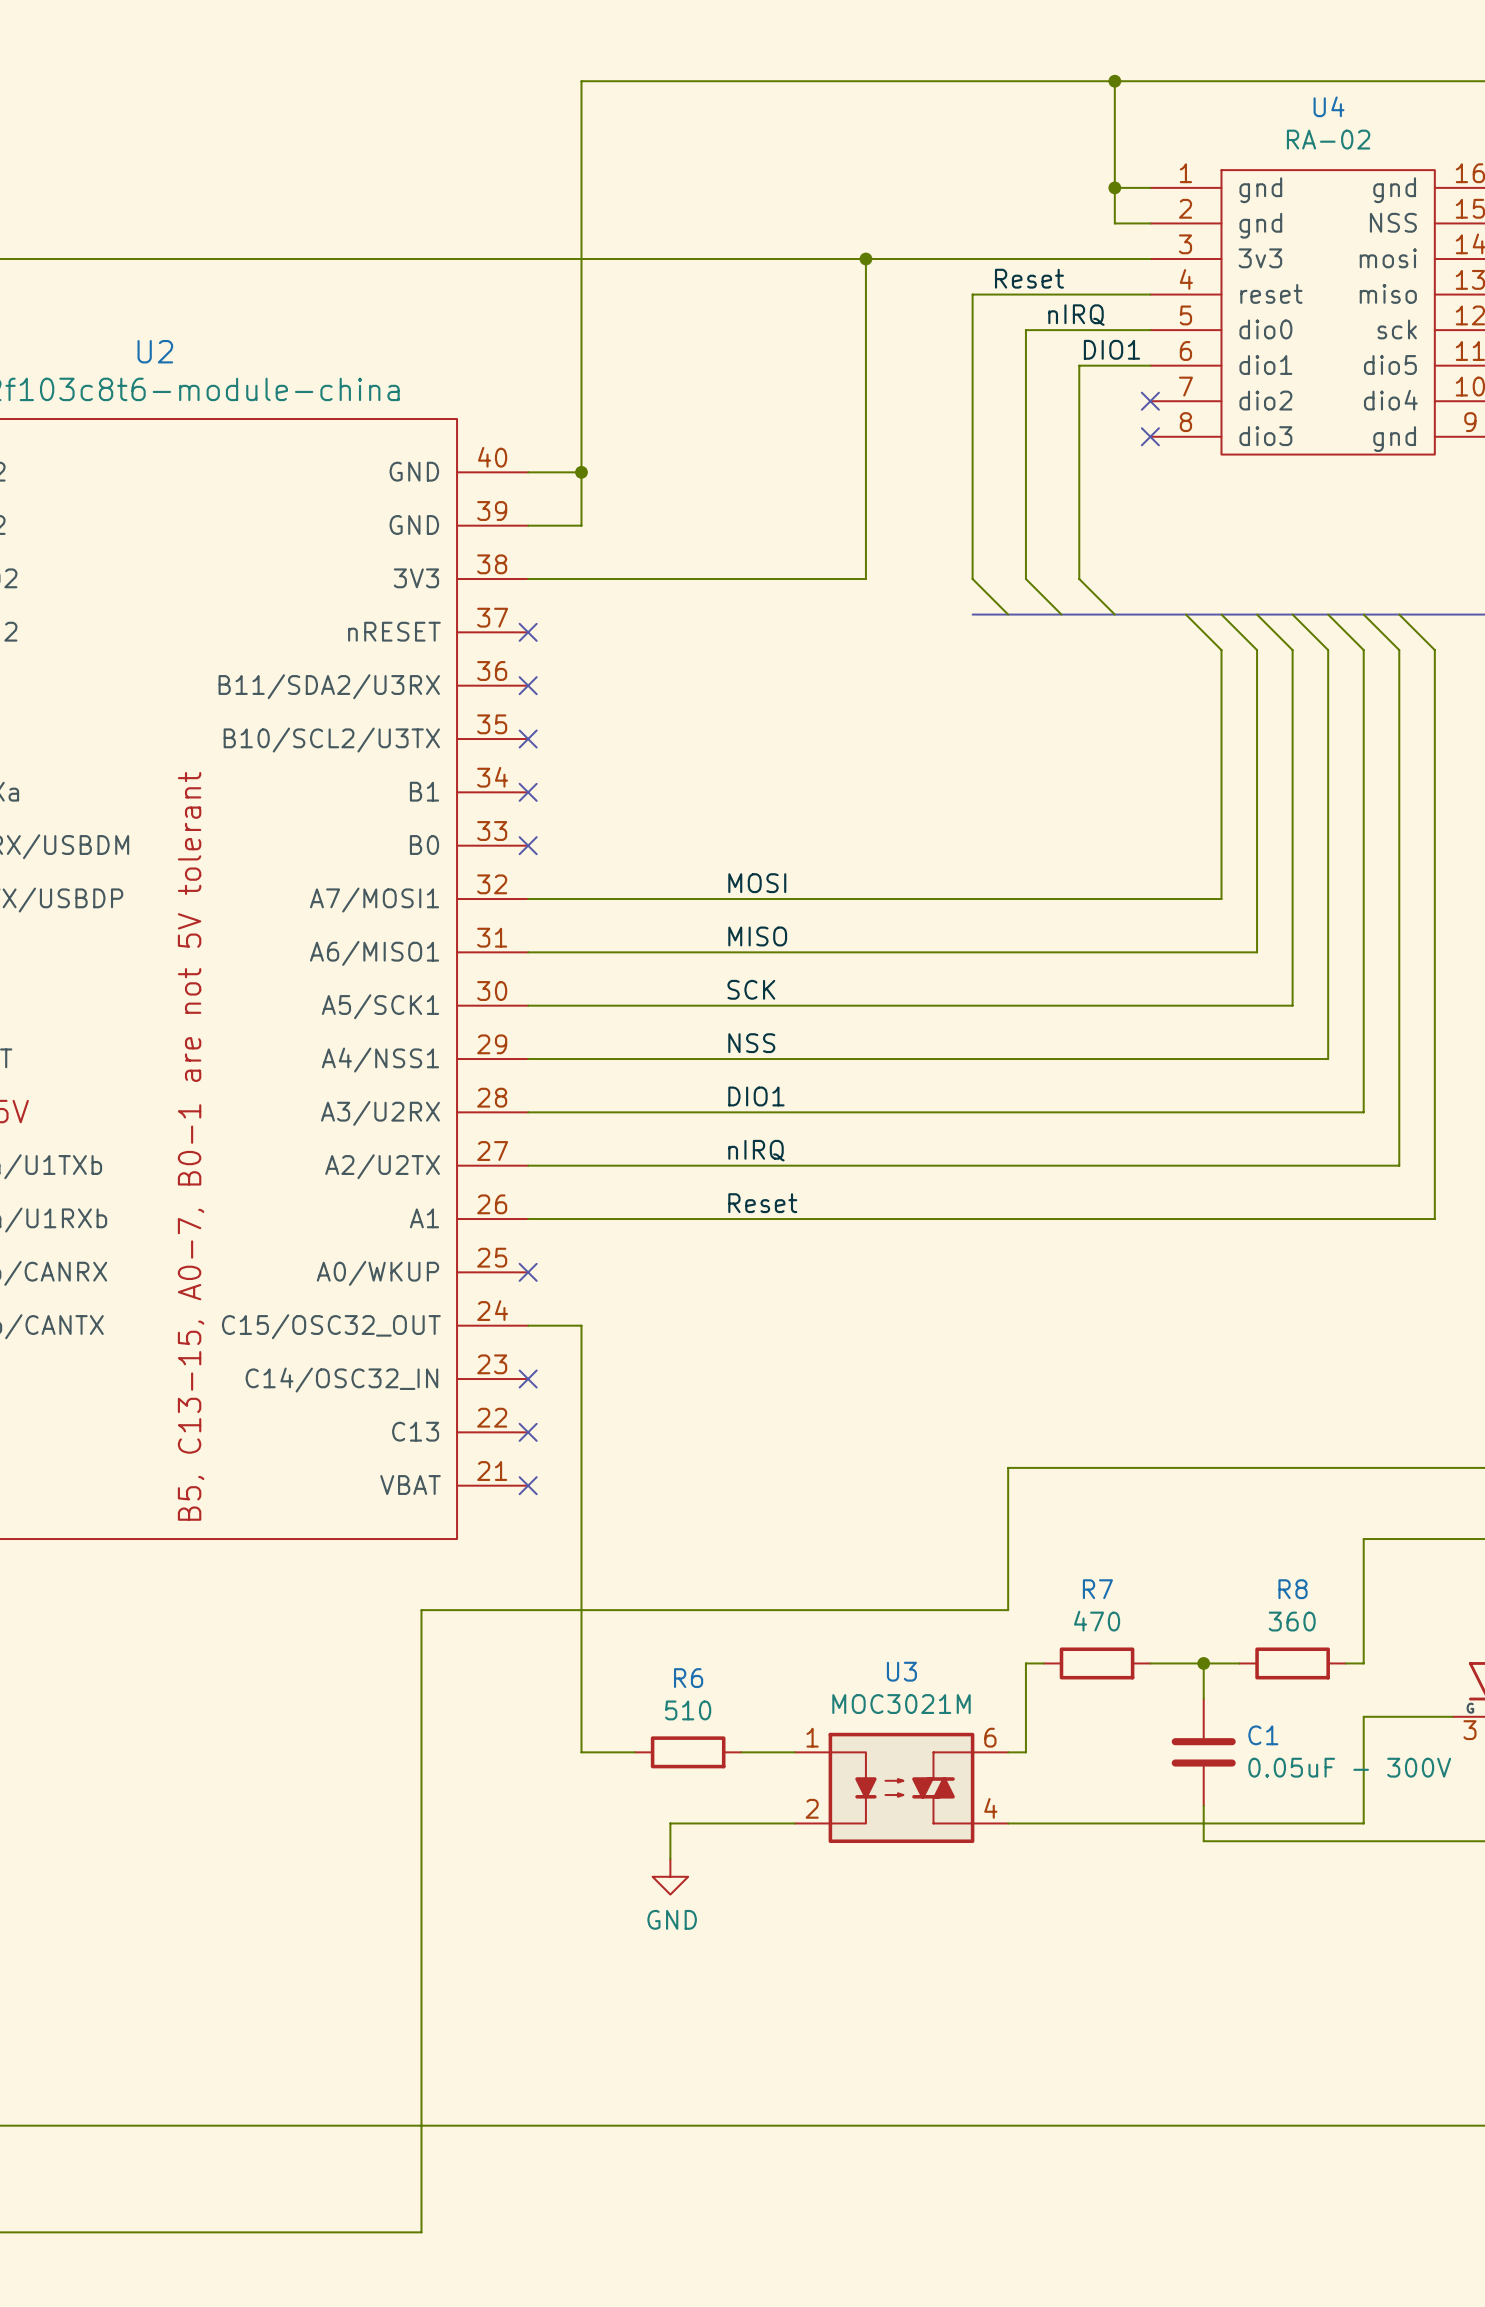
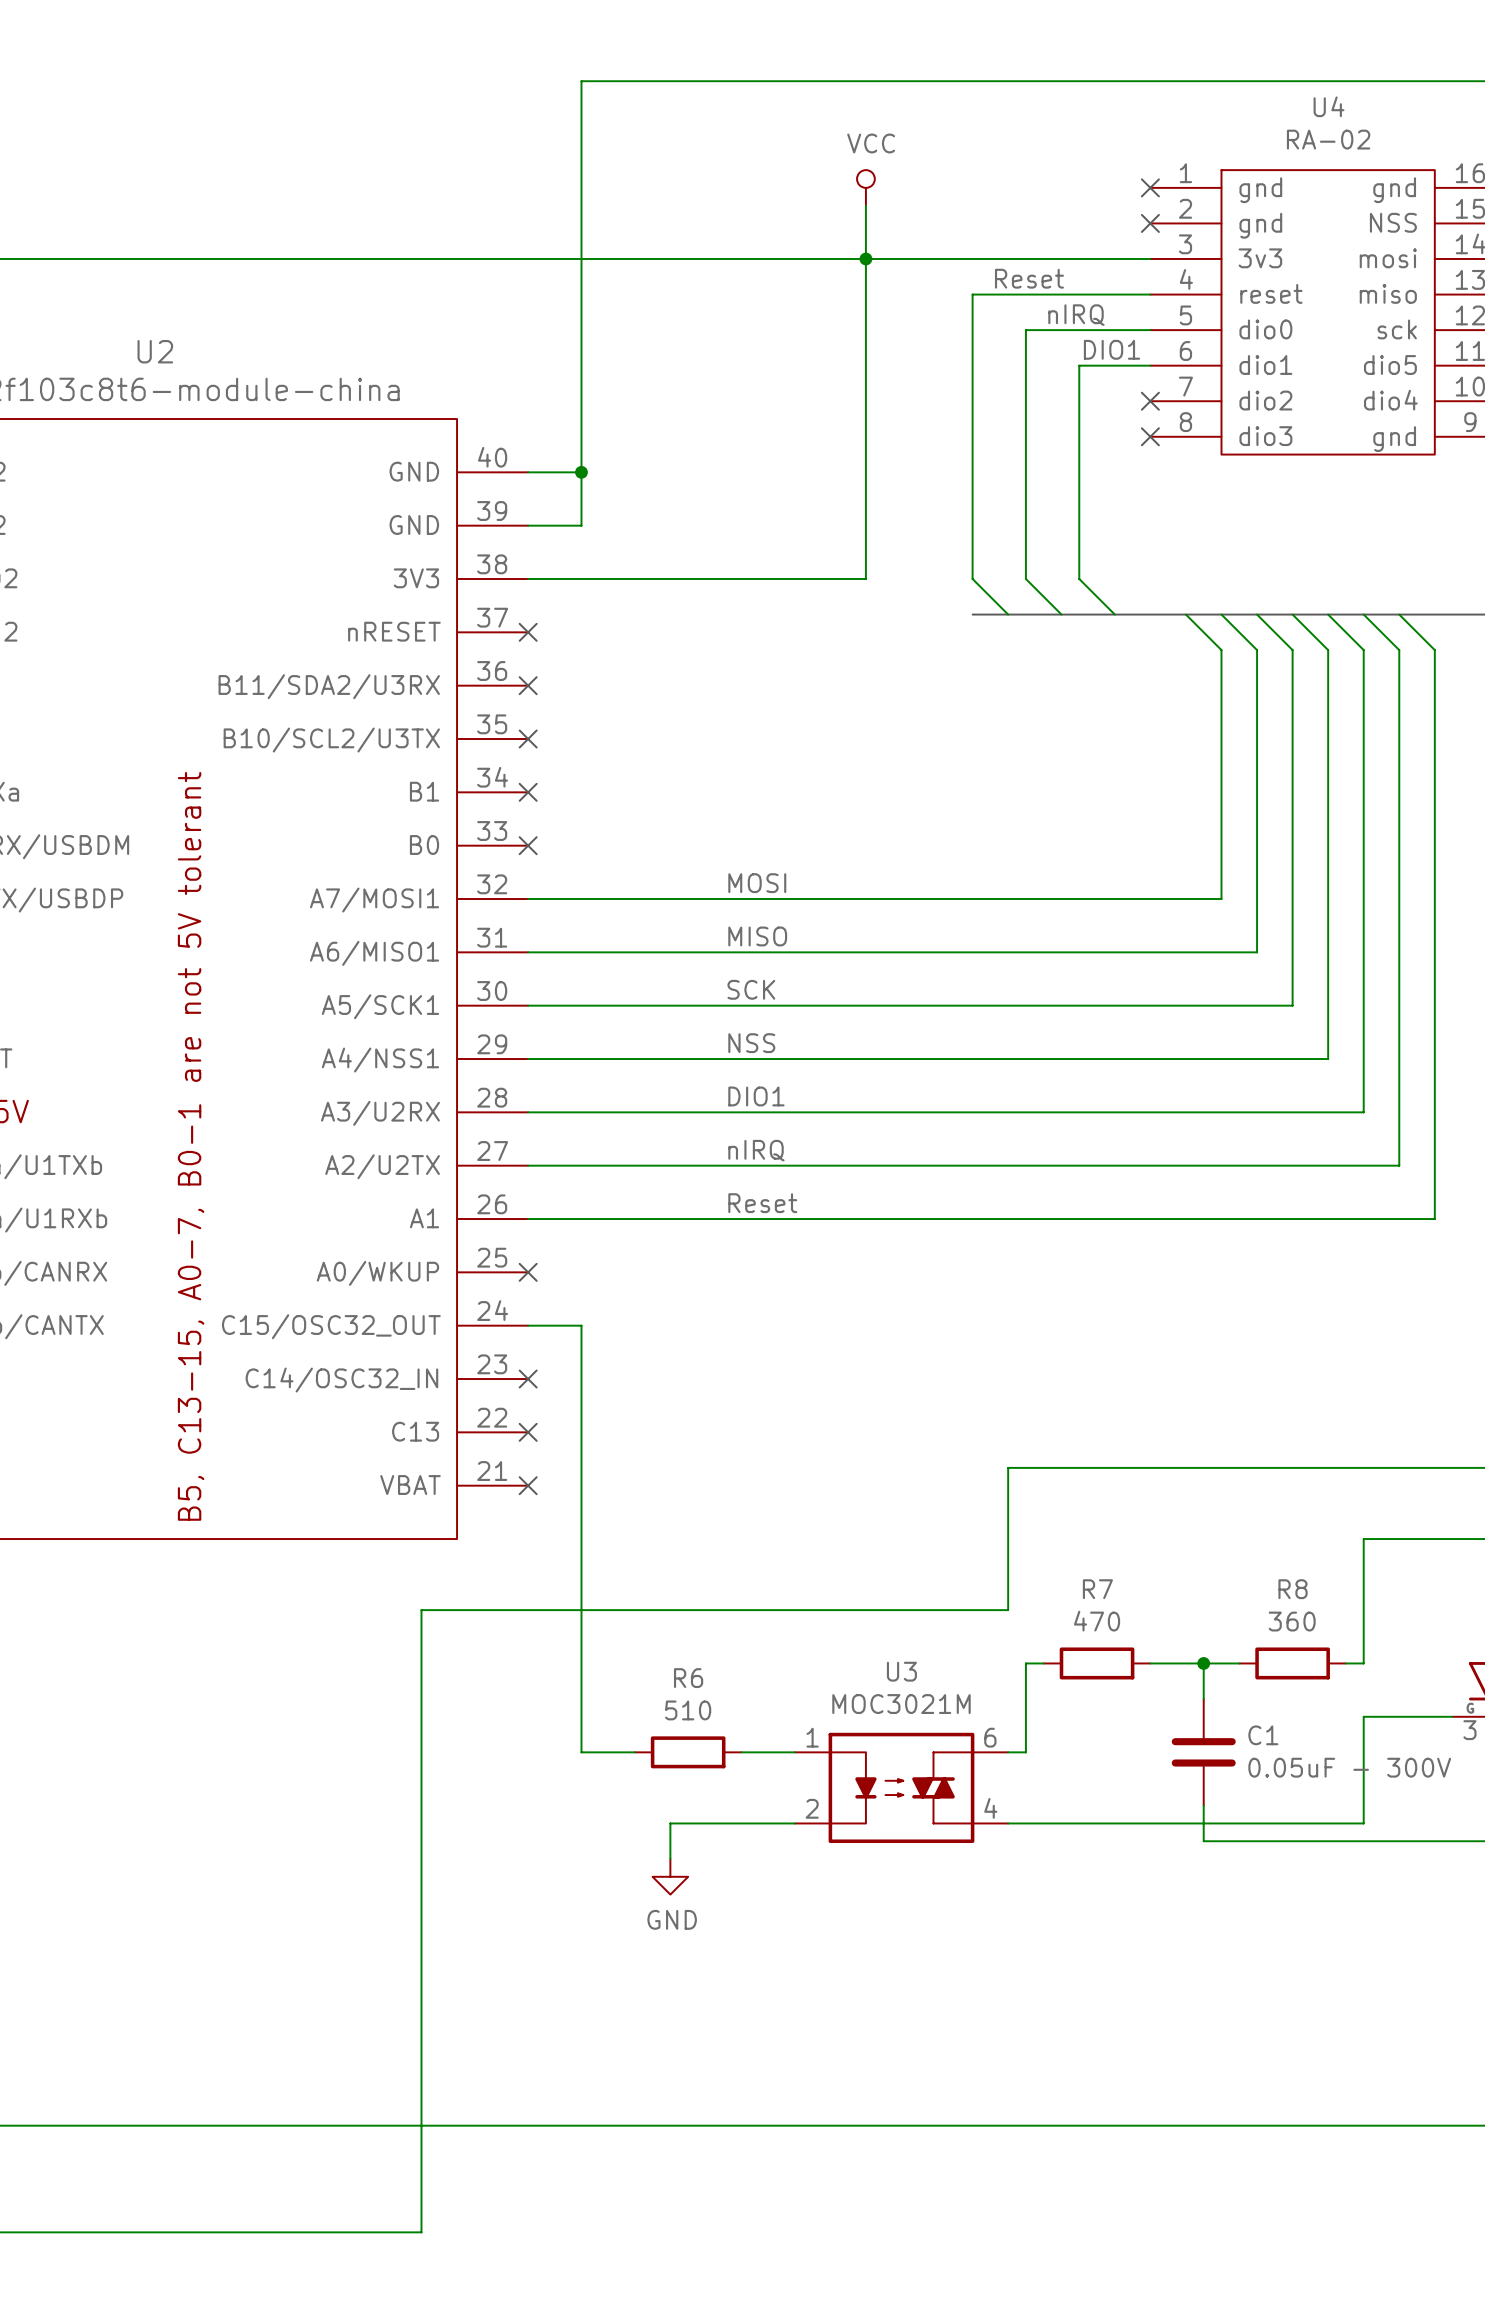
wire: (1114, 81) (1114, 223) (1150, 223) -> none
junction: (1114, 81) -> none
power symbol: none -> VCC (865, 187)
wire: (1114, 187) (1150, 187) -> none
junction: (1114, 187) -> none
no-connect mark: none -> (1150, 187)
wire: none -> (865, 205) (865, 259)
no-connect mark: none -> (1150, 223)

